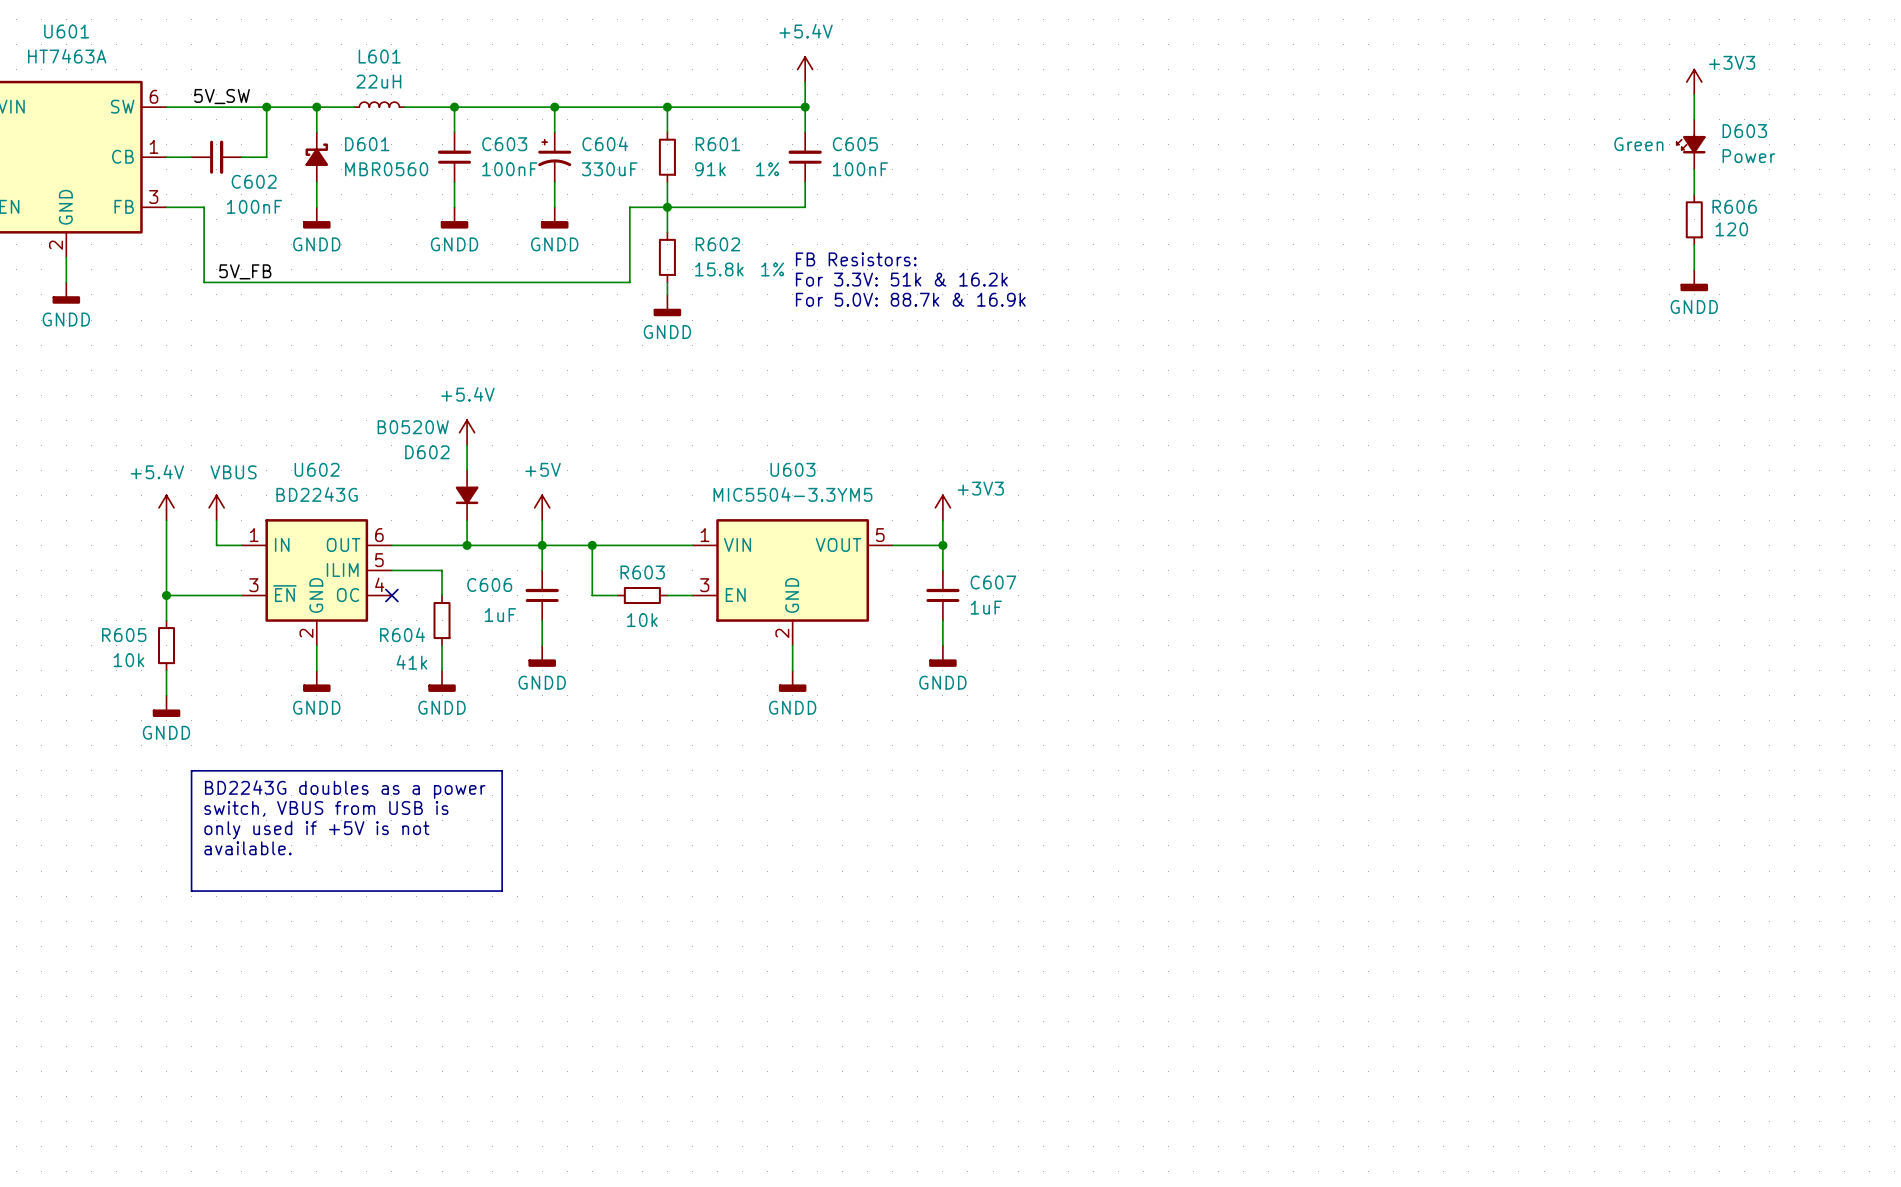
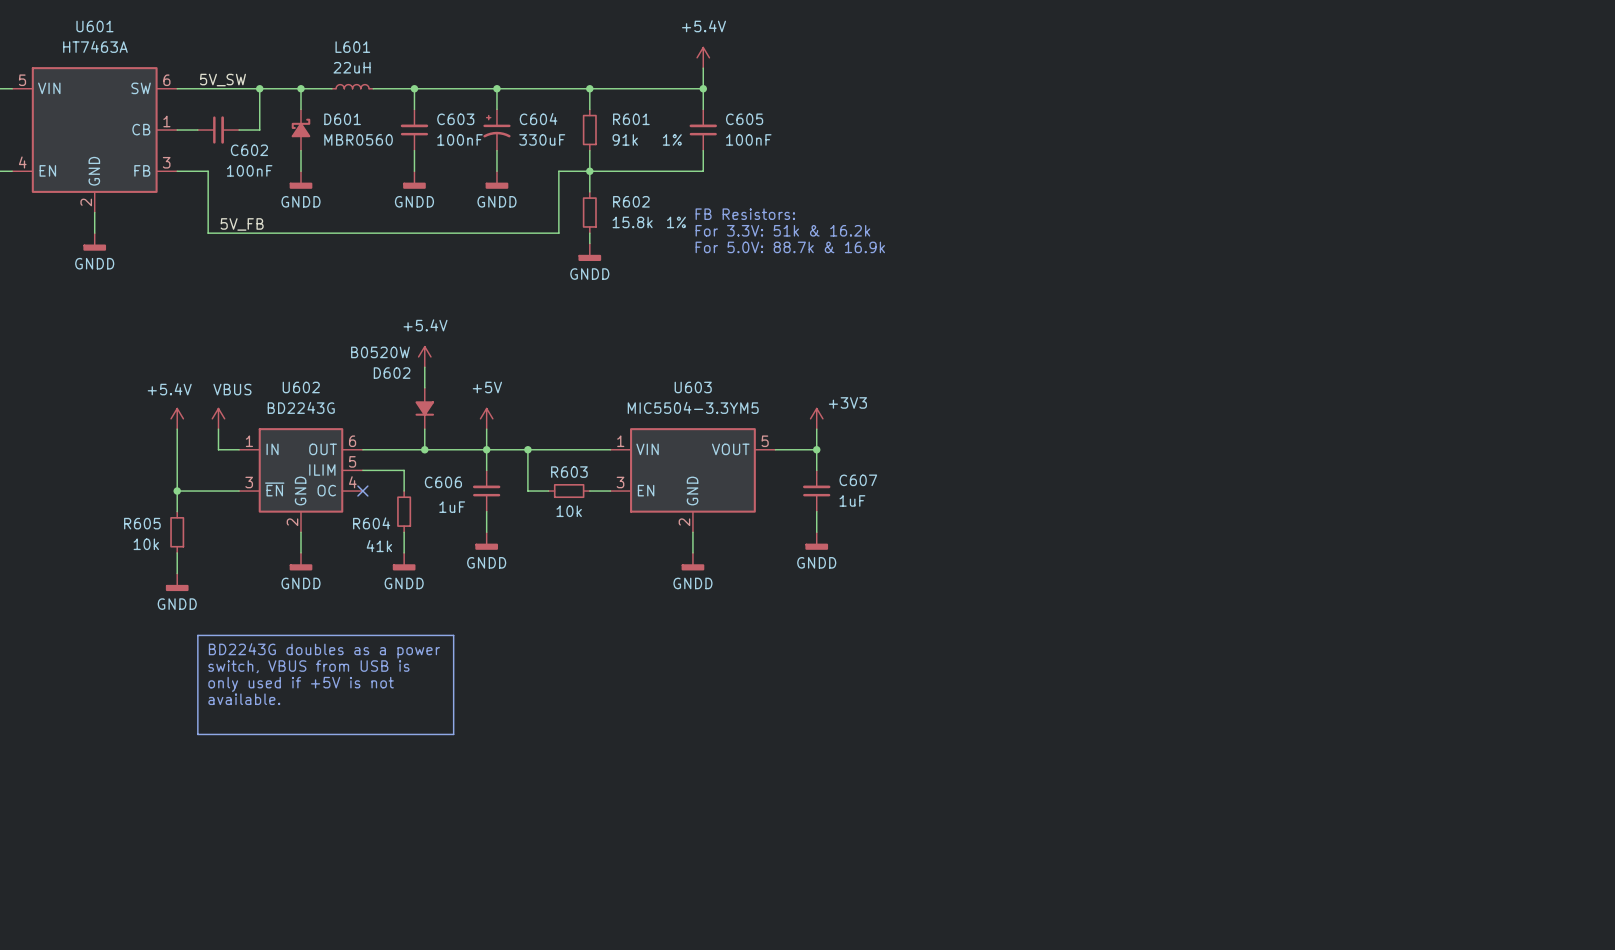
power symbol: +3V3 (1694, 82) -> none
wire: (1694, 94) (1694, 119) -> none
D603: Power (1691, 144) -> none
wire: (1694, 169) (1694, 194) -> none
R606: 120 (1694, 219) -> none
wire: (1694, 244) (1694, 269) -> none
power symbol: GNDD (1694, 280) -> none

